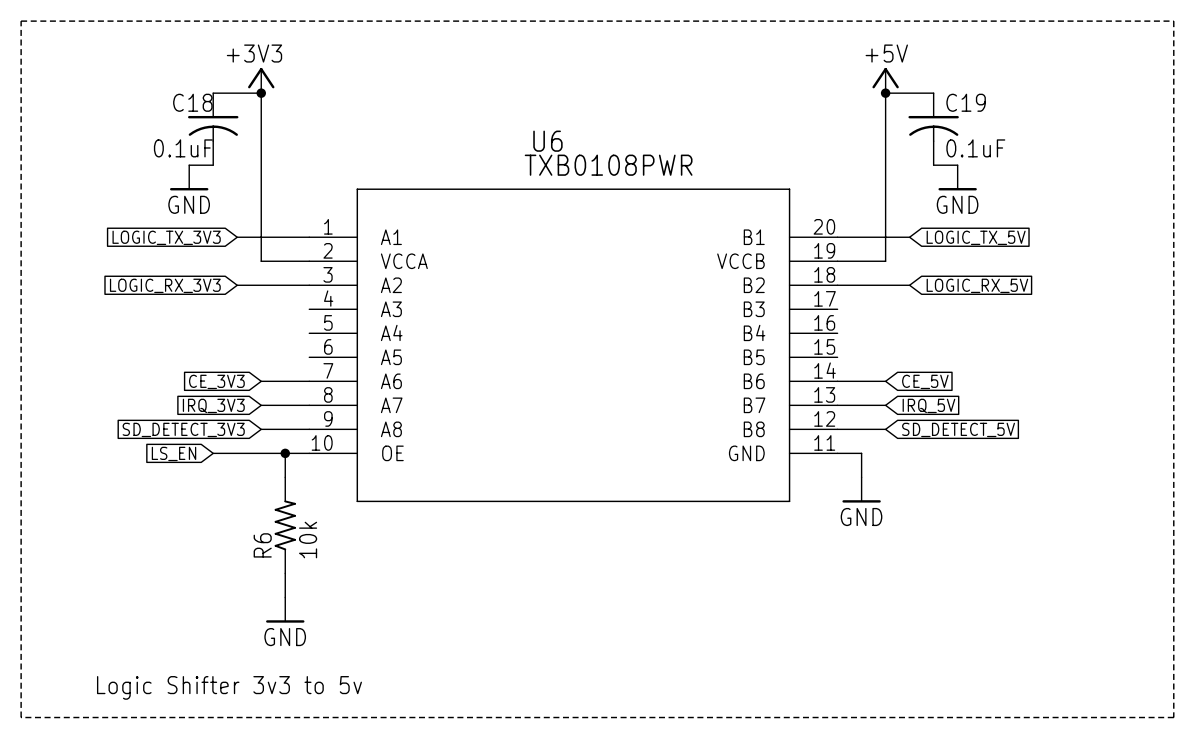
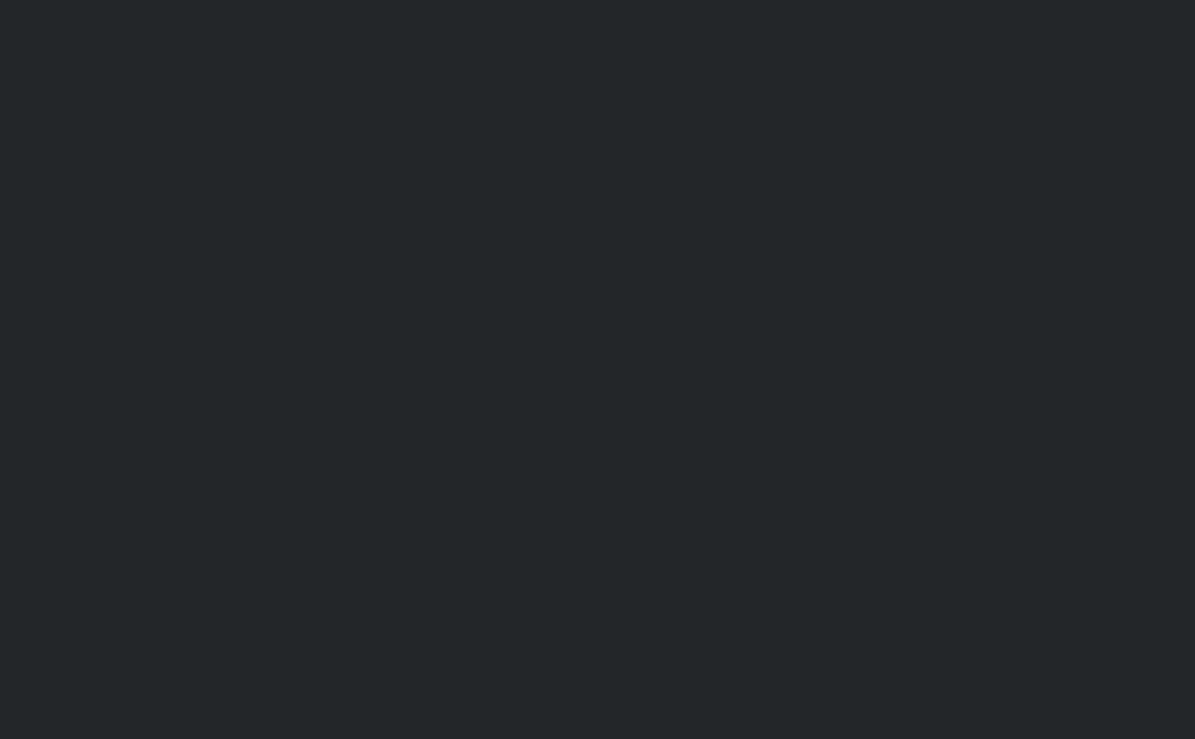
line: (21, 21) (1173, 21) (1173, 717) (21, 717) (21, 21) -> none
power symbol: +3V3 (261, 80) -> none
power symbol: +5V (885, 80) -> none
wire: (213, 93) (261, 93) (261, 261) (309, 261) -> none
junction: (261, 93) -> none
junction: (885, 93) -> none
wire: (933, 93) (885, 93) (885, 261) (837, 261) -> none
C18: 0.1uF (213, 129) -> none
C19: 0.1uF (933, 129) -> none
wire: (189, 165) (213, 165) -> none
wire: (933, 165) (957, 165) -> none
power symbol: GND (189, 177) -> none
power symbol: GND (957, 177) -> none
global label: LOGIC_TX_3V3 (166, 237) -> none
wire: (237, 237) (309, 237) -> none
wire: (837, 237) (909, 237) -> none
global label: LOGIC_TX_5V (976, 237) -> none
global label: LOGIC_RX_3V3 (165, 285) -> none
wire: (237, 285) (309, 285) -> none
wire: (837, 285) (909, 285) -> none
global label: LOGIC_RX_5V (977, 285) -> none
U6: TXB0108PWR (573, 345) -> none
global label: CE_3V3 (216, 381) -> none
wire: (261, 381) (309, 381) -> none
wire: (837, 381) (885, 381) -> none
global label: CE_5V (925, 381) -> none
global label: IRQ_3V3 (213, 405) -> none
wire: (261, 405) (309, 405) -> none
wire: (837, 405) (885, 405) -> none
global label: IRQ_5V (928, 405) -> none
global label: SD_DETECT_3V3 (183, 429) -> none
wire: (261, 429) (309, 429) -> none
wire: (837, 429) (885, 429) -> none
global label: SD_DETECT_5V (958, 429) -> none
global label: LS_EN (174, 453) -> none
wire: (213, 453) (309, 453) -> none
wire: (285, 453) (285, 477) -> none
junction: (285, 453) -> none
wire: (837, 453) (861, 453) (861, 477) -> none
power symbol: GND (861, 489) -> none
R6: 10k (285, 525) -> none
wire: (285, 573) (285, 597) -> none
power symbol: GND (285, 610) -> none
text: Logic Shifter 3v3 to 5v (229, 687) -> none

